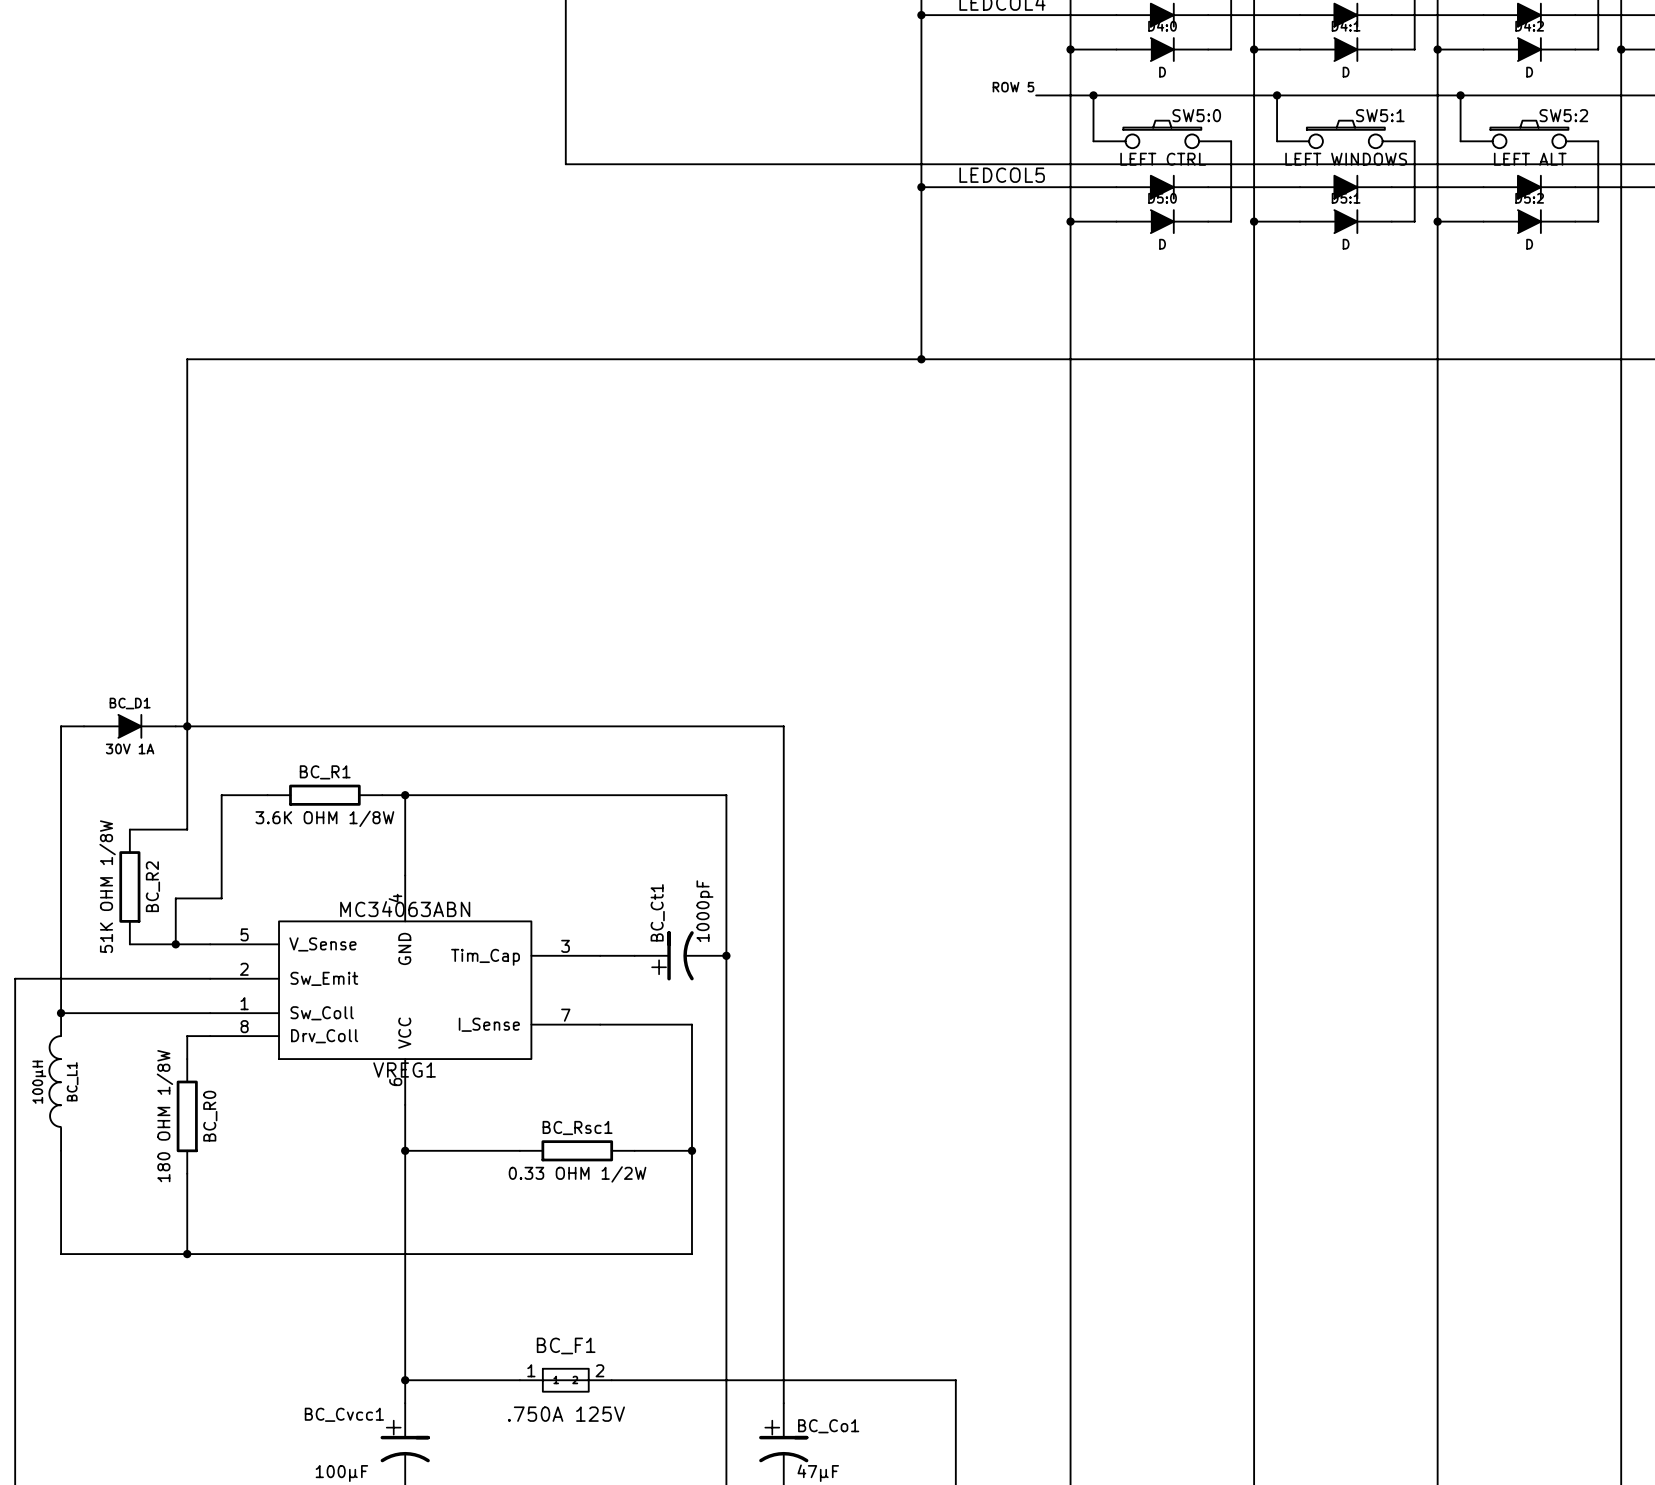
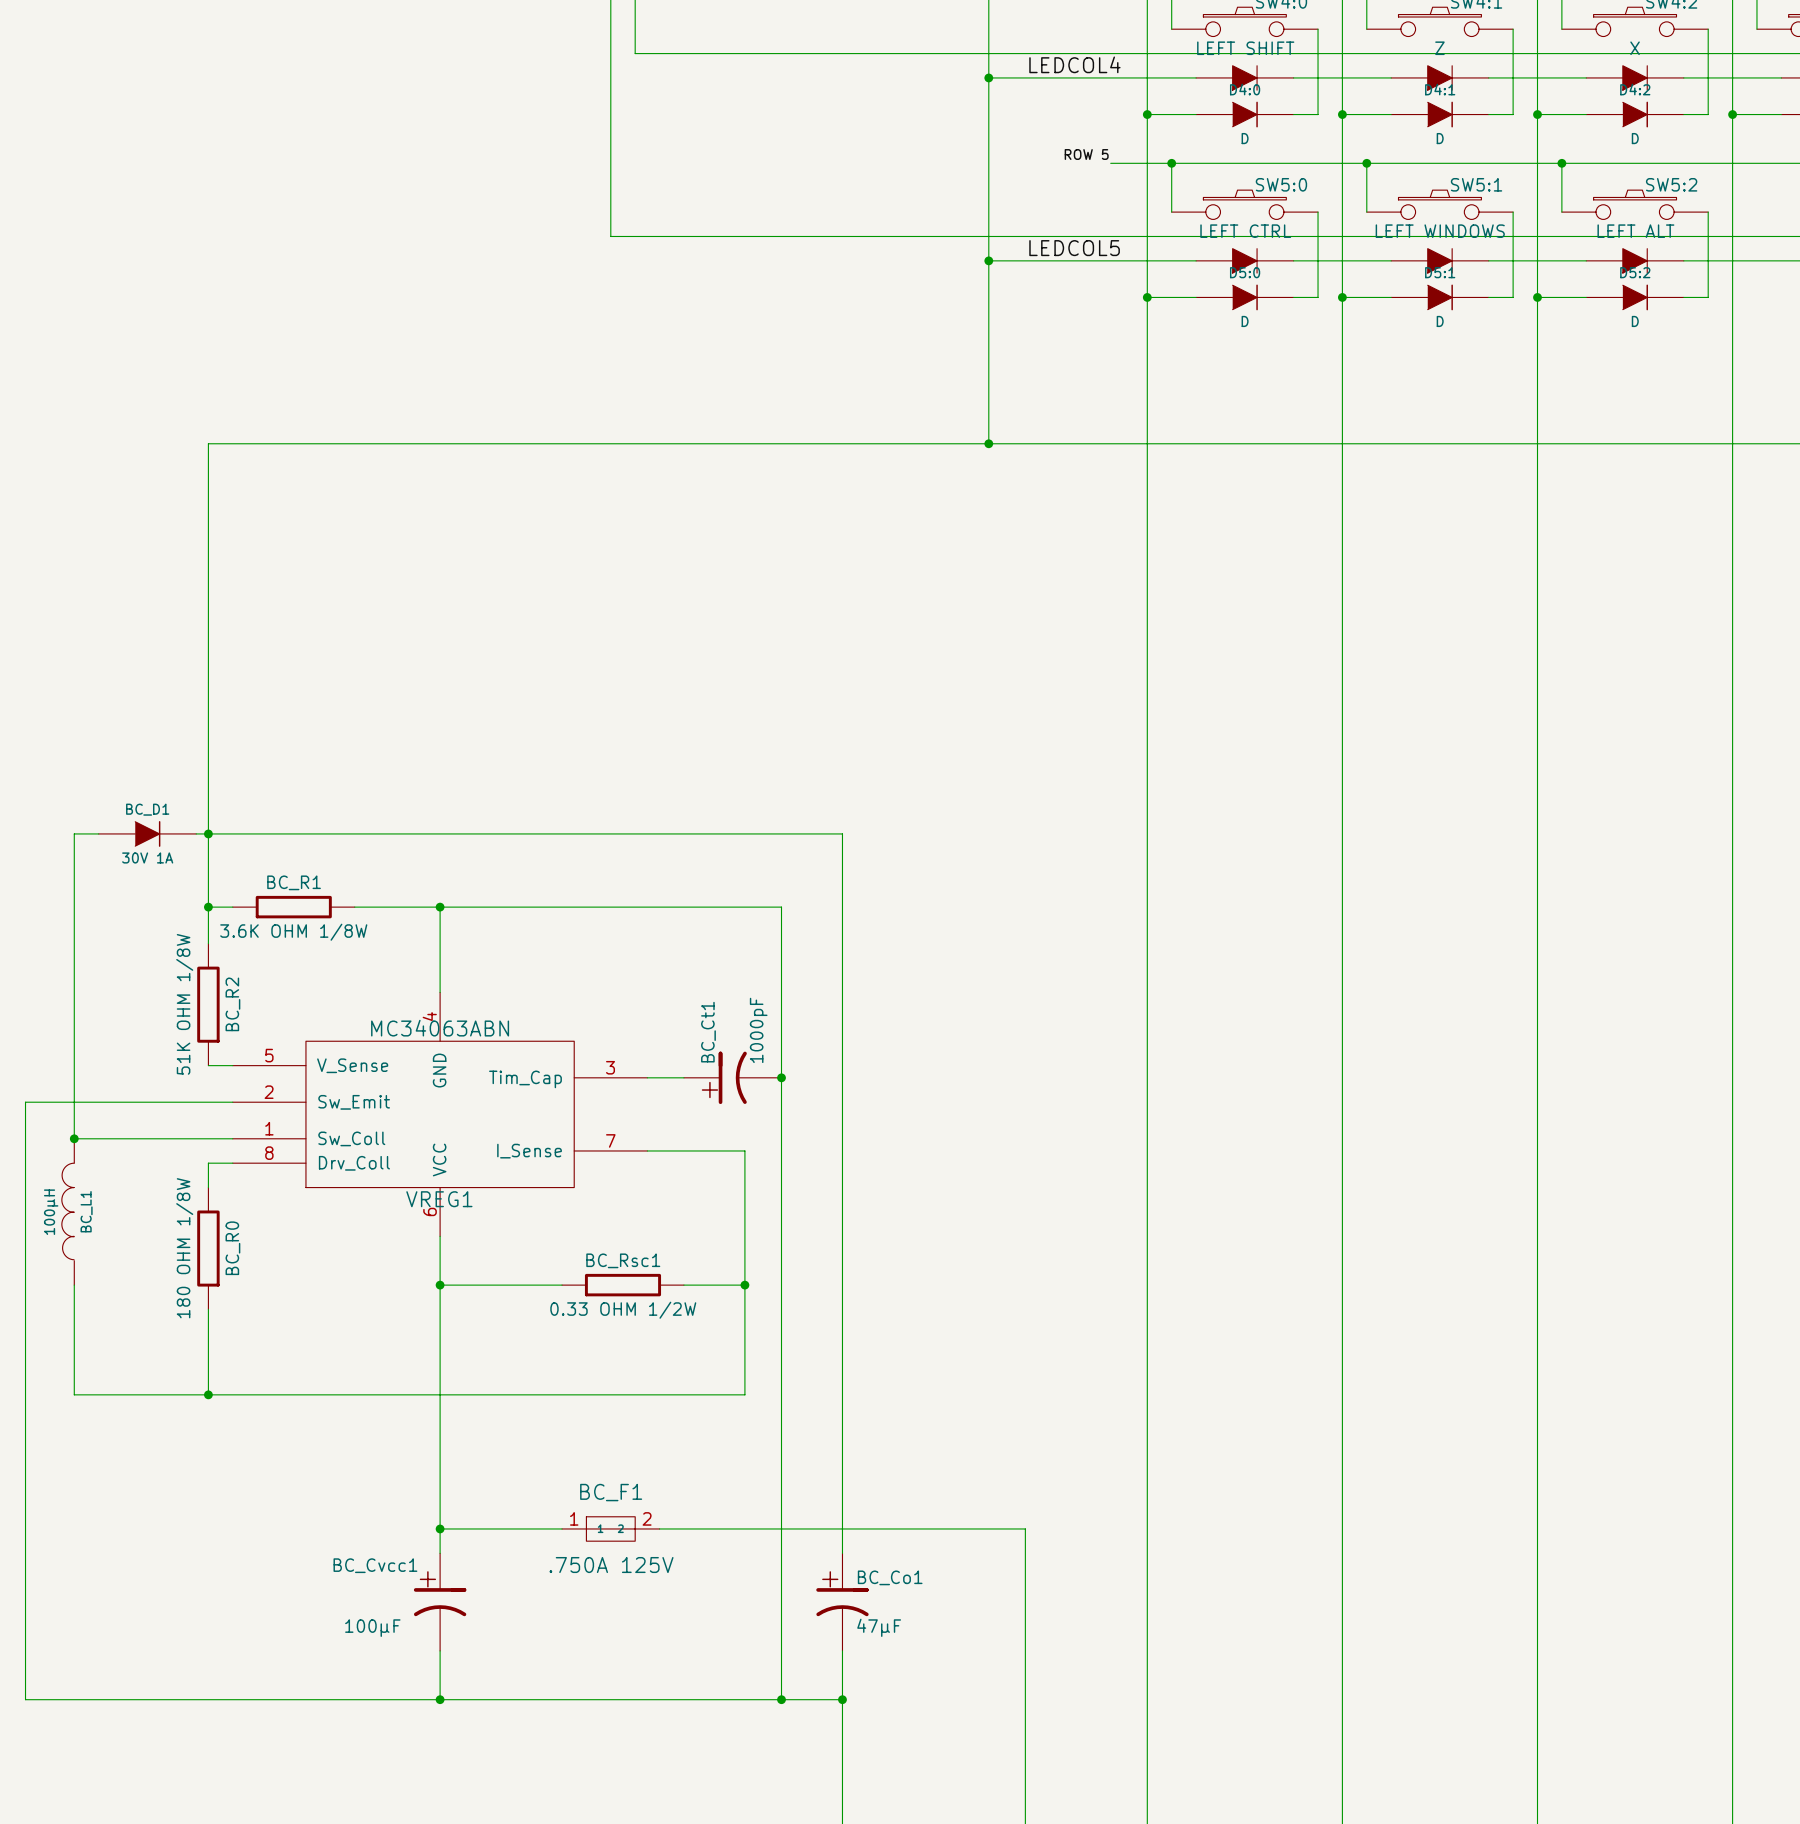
wire: none -> (208, 907) (232, 907)
junction: none -> (208, 907)
wire: (267, 795) (221, 795) (221, 898) (175, 898) (175, 944) -> none
BC_R1 position: (324, 795) -> (293, 907)
wire: (129, 829) (187, 829) -> (354, 907) (415, 907)
BC_R2 position: (129, 886) -> (208, 1004)
wire: (129, 944) (187, 944) -> none
junction: (175, 944) -> none

